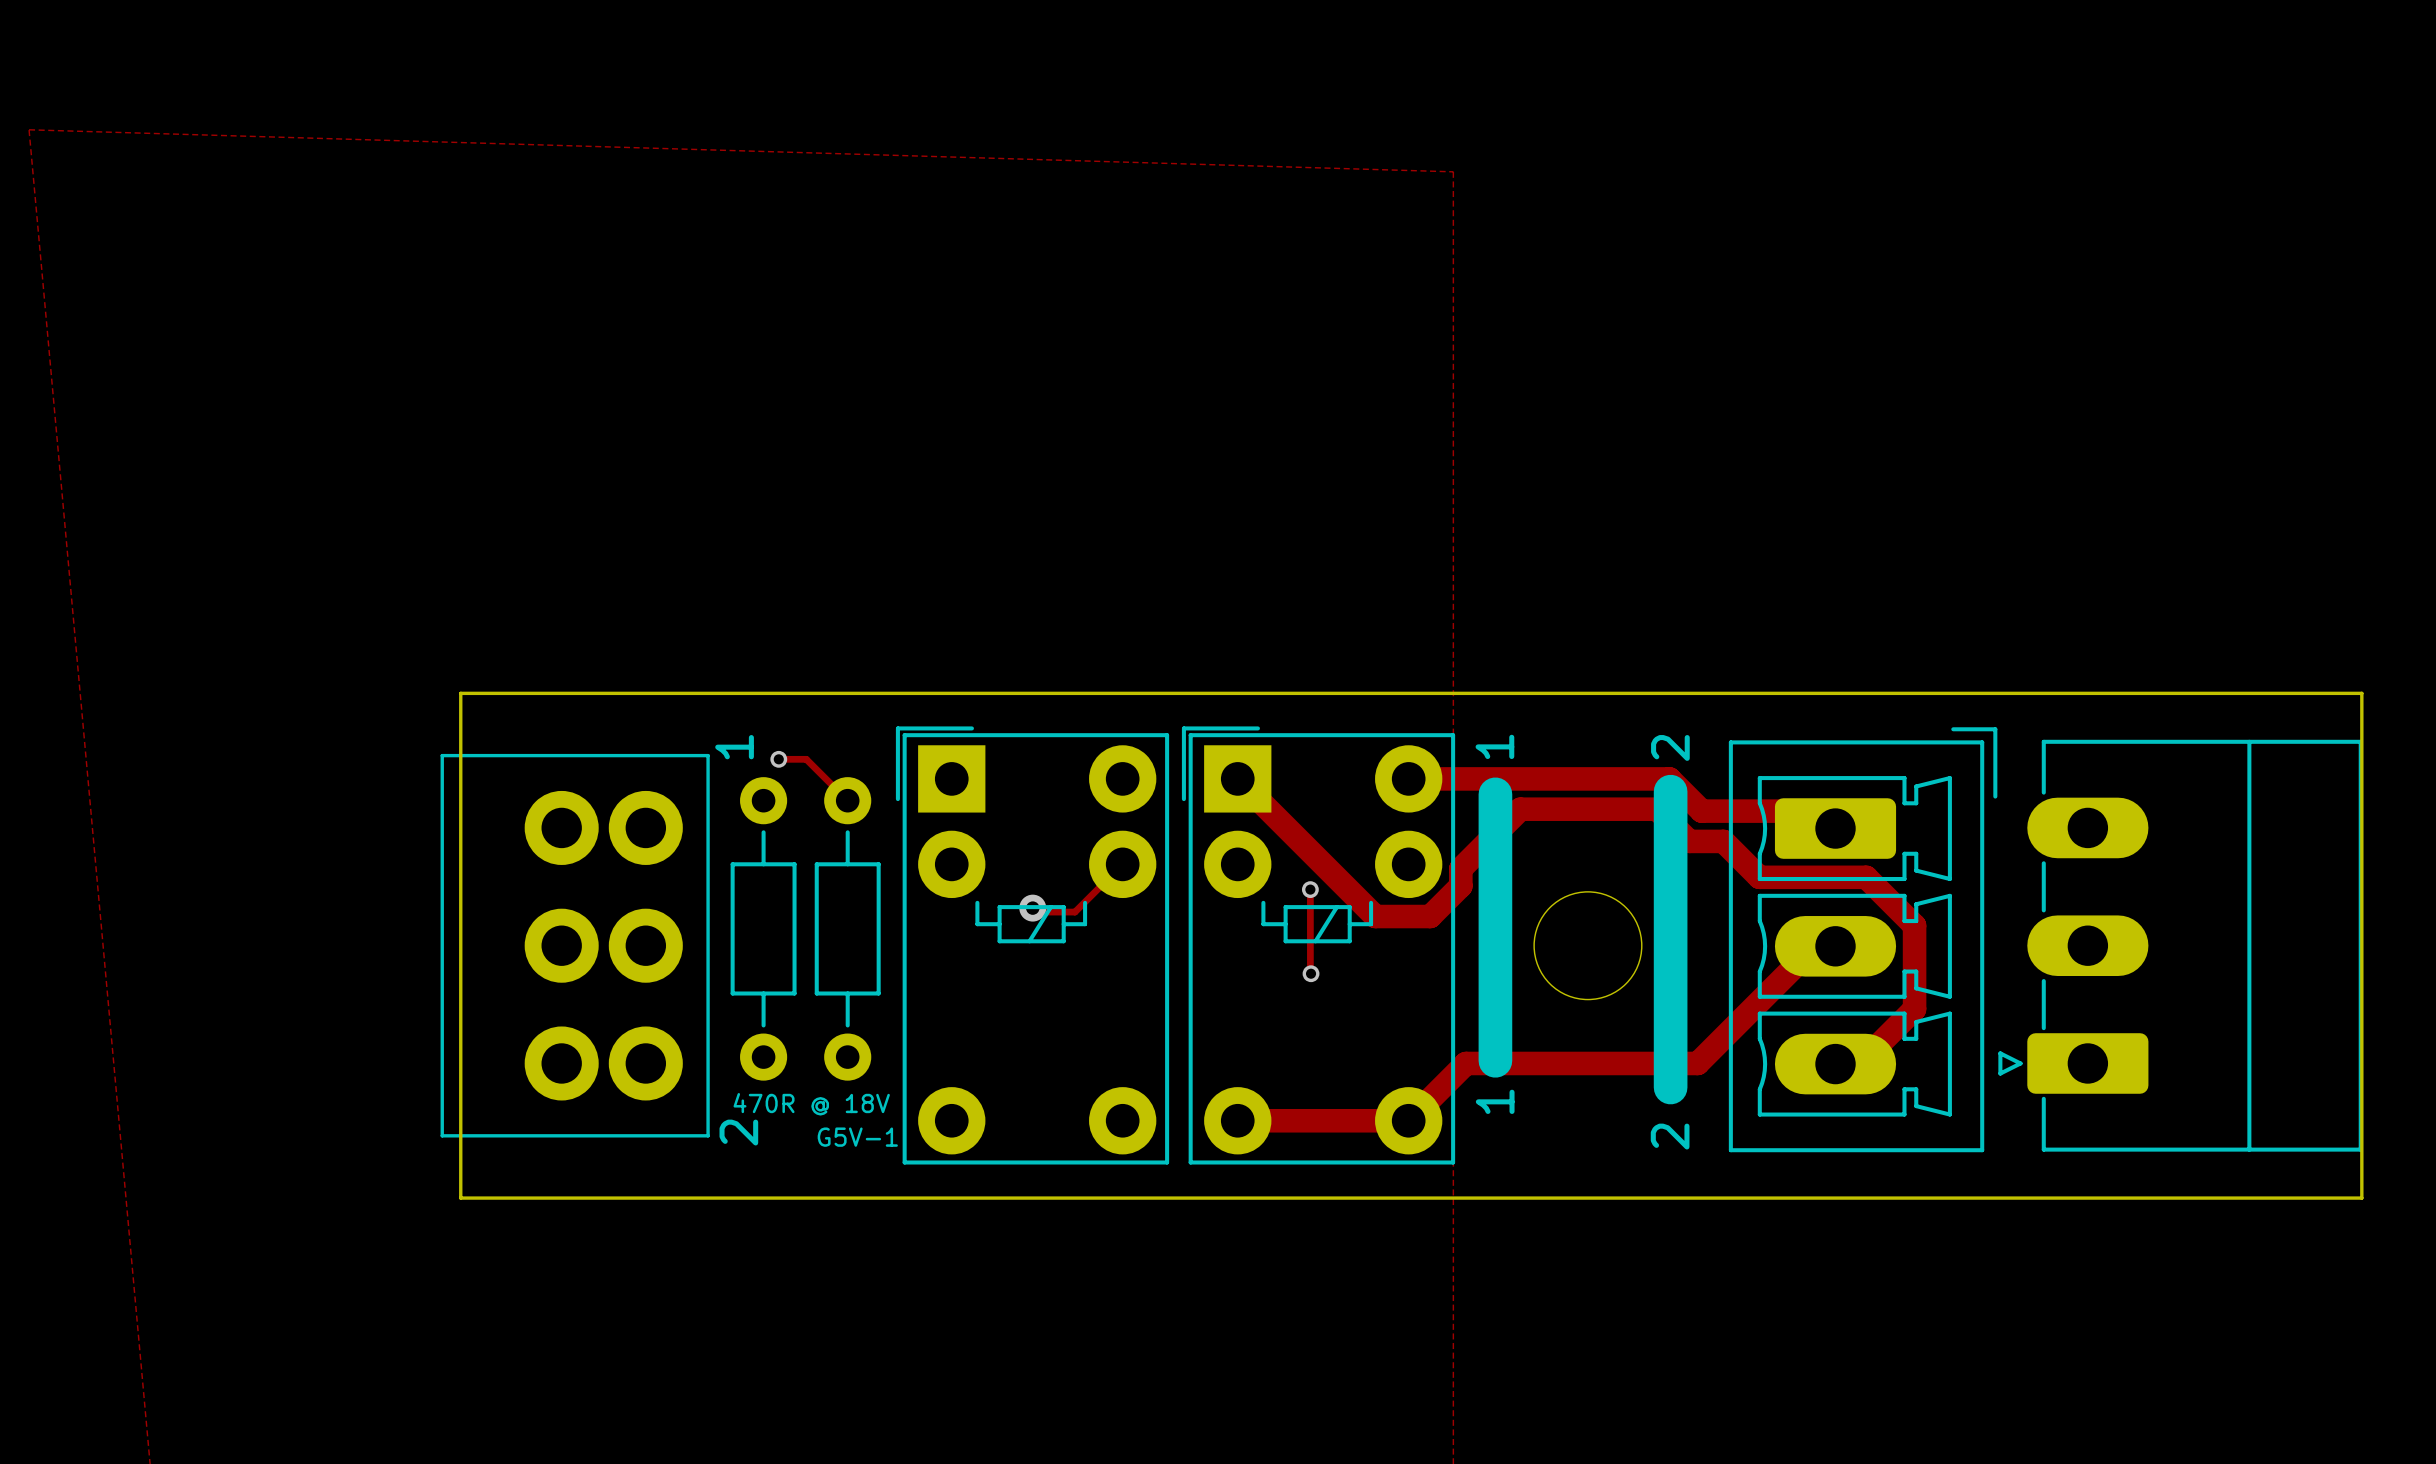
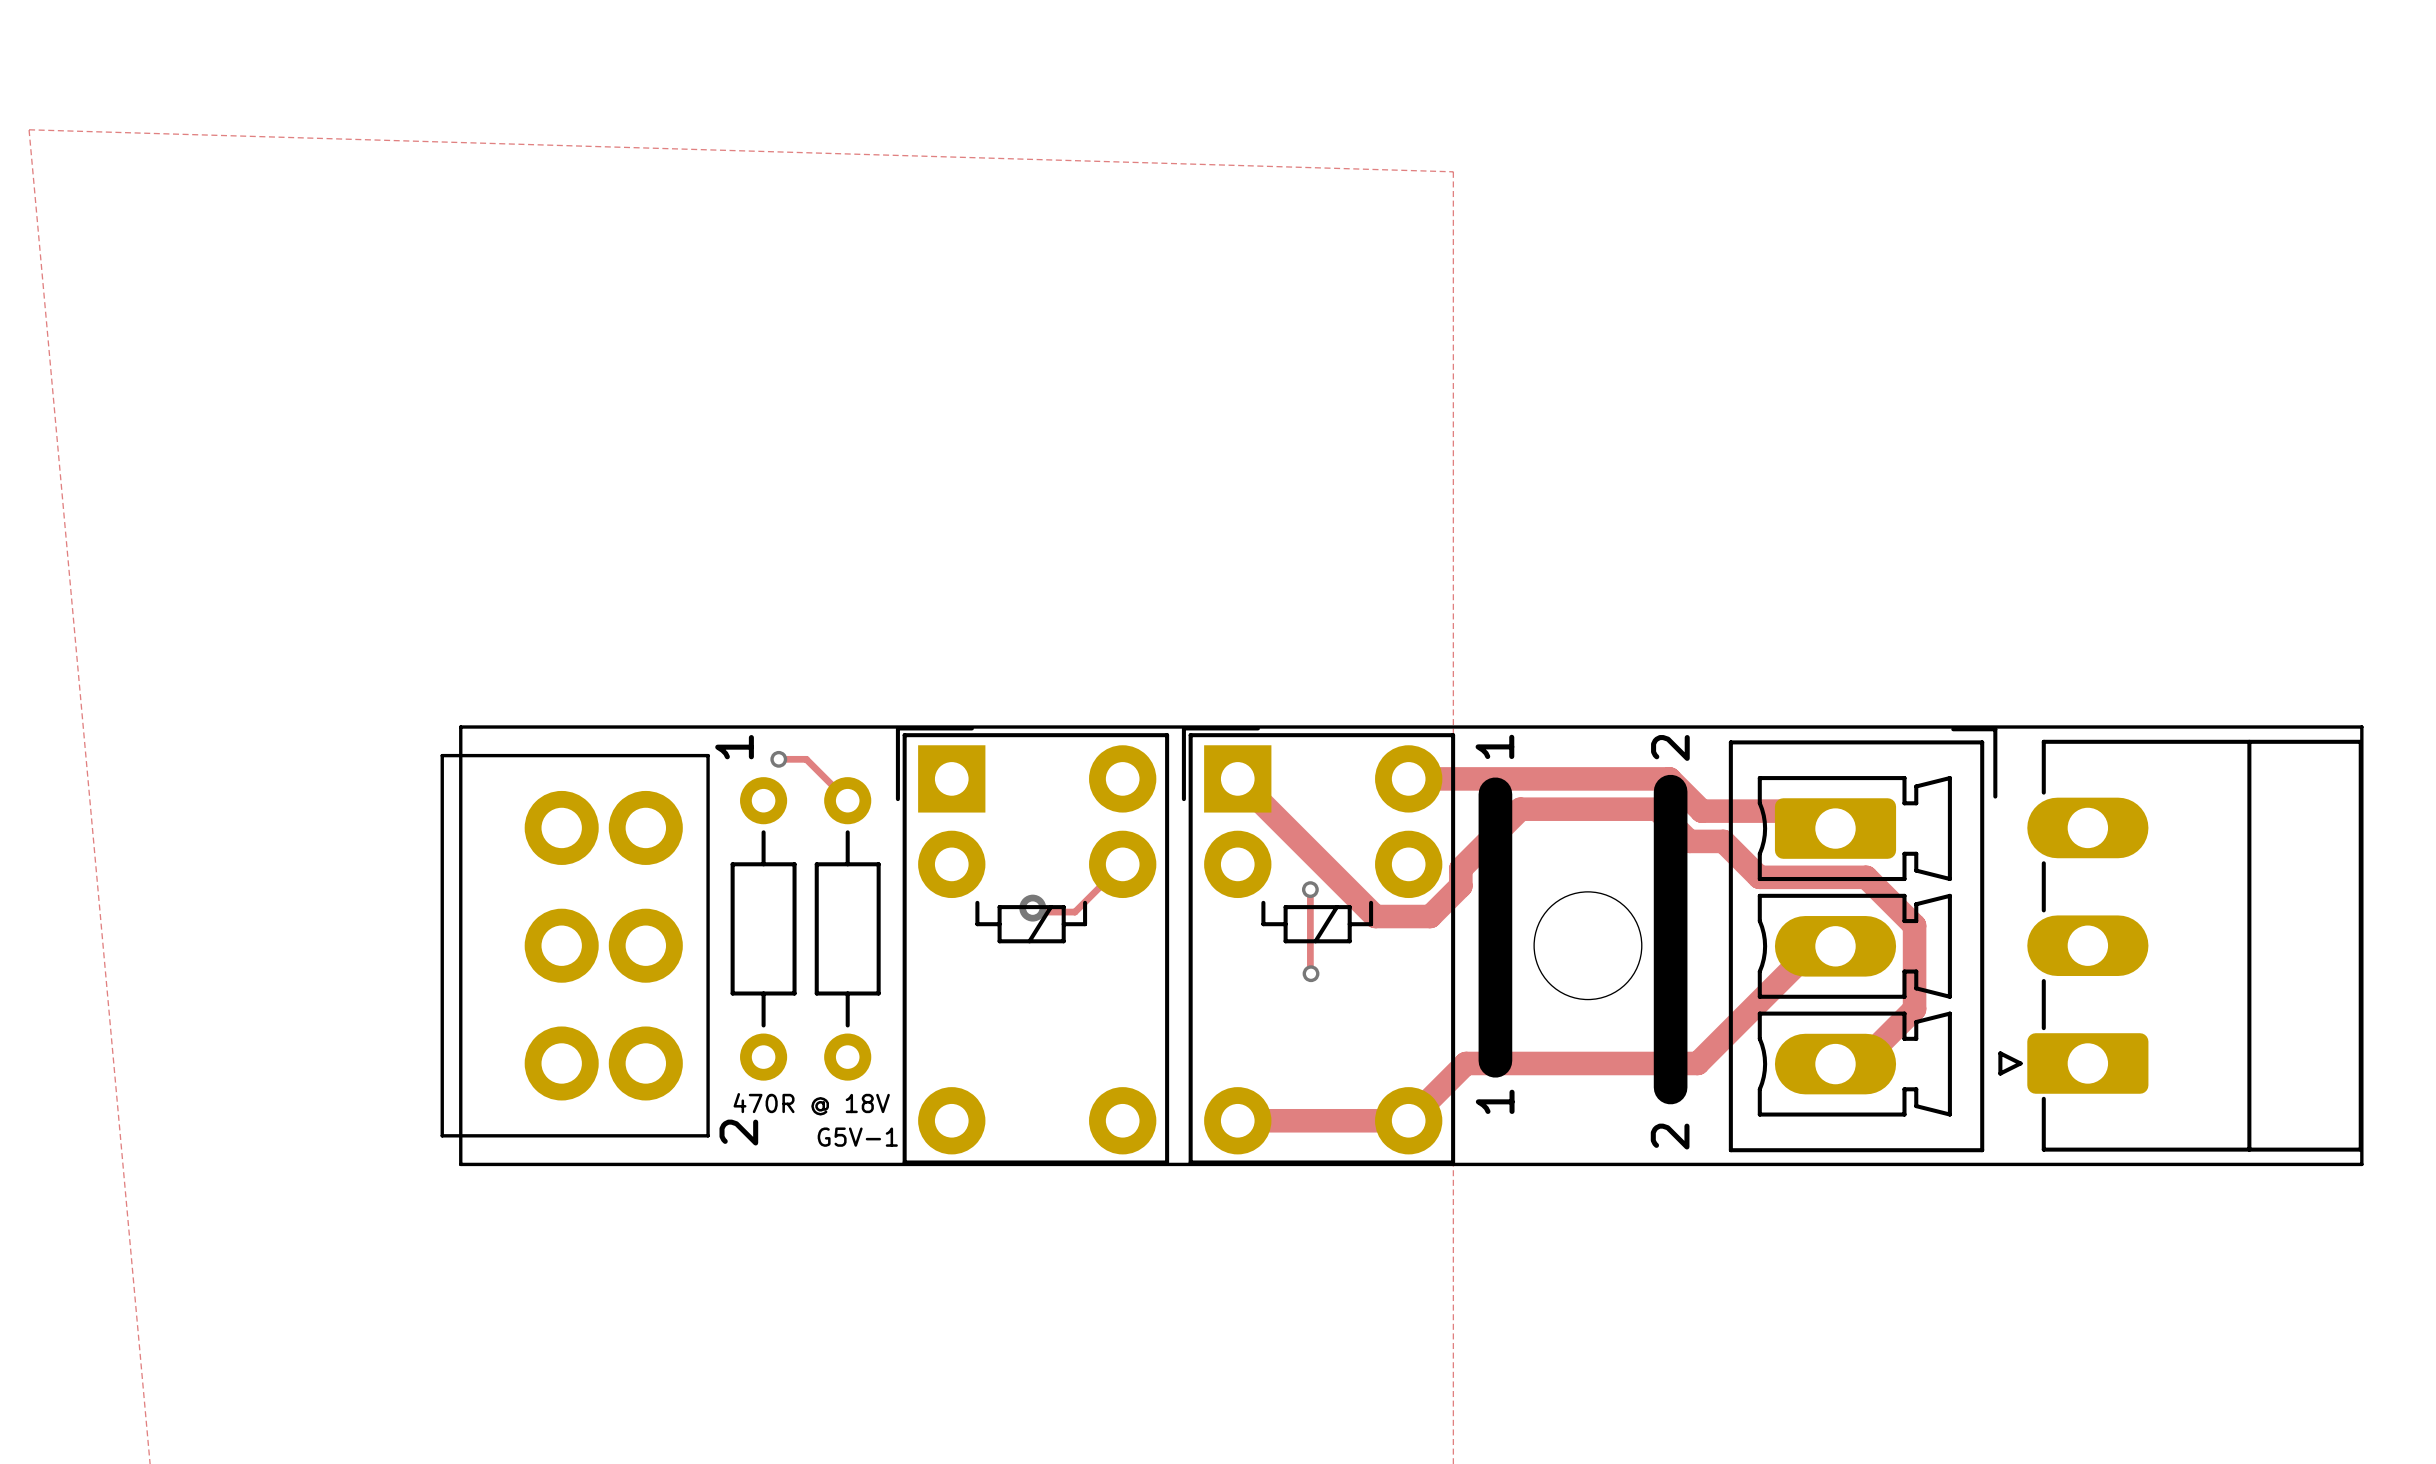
board edge: (460, 727) (460, 693) (2361, 693) (2361, 727) -> (460, 727) (2361, 727)
board edge: (460, 1164) (460, 1198) (2361, 1198) (2361, 1164) -> (460, 1164) (2361, 1164)

